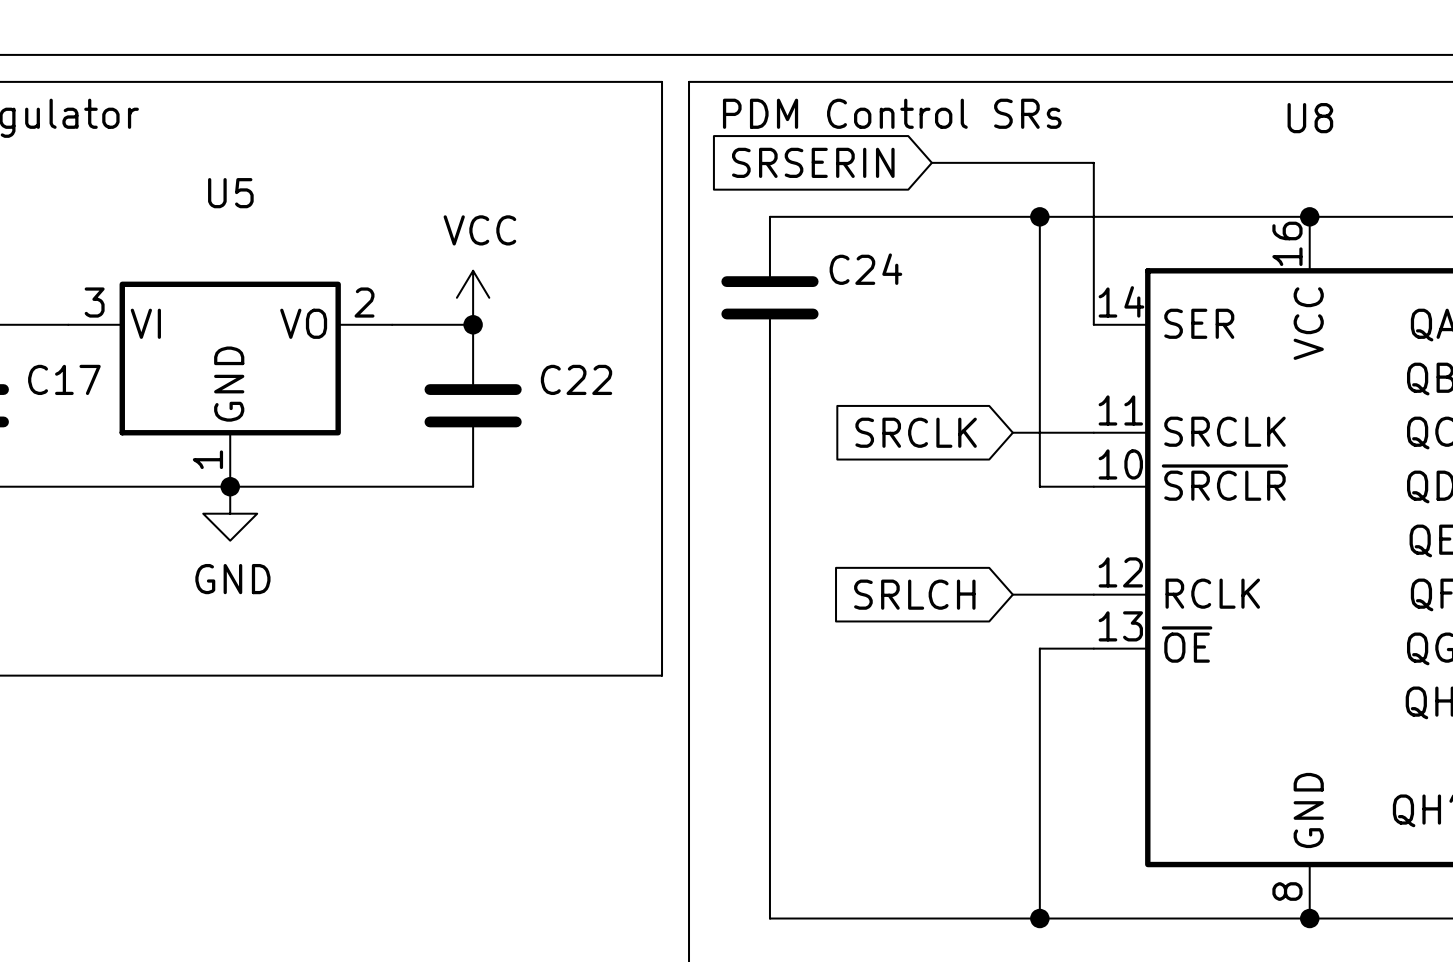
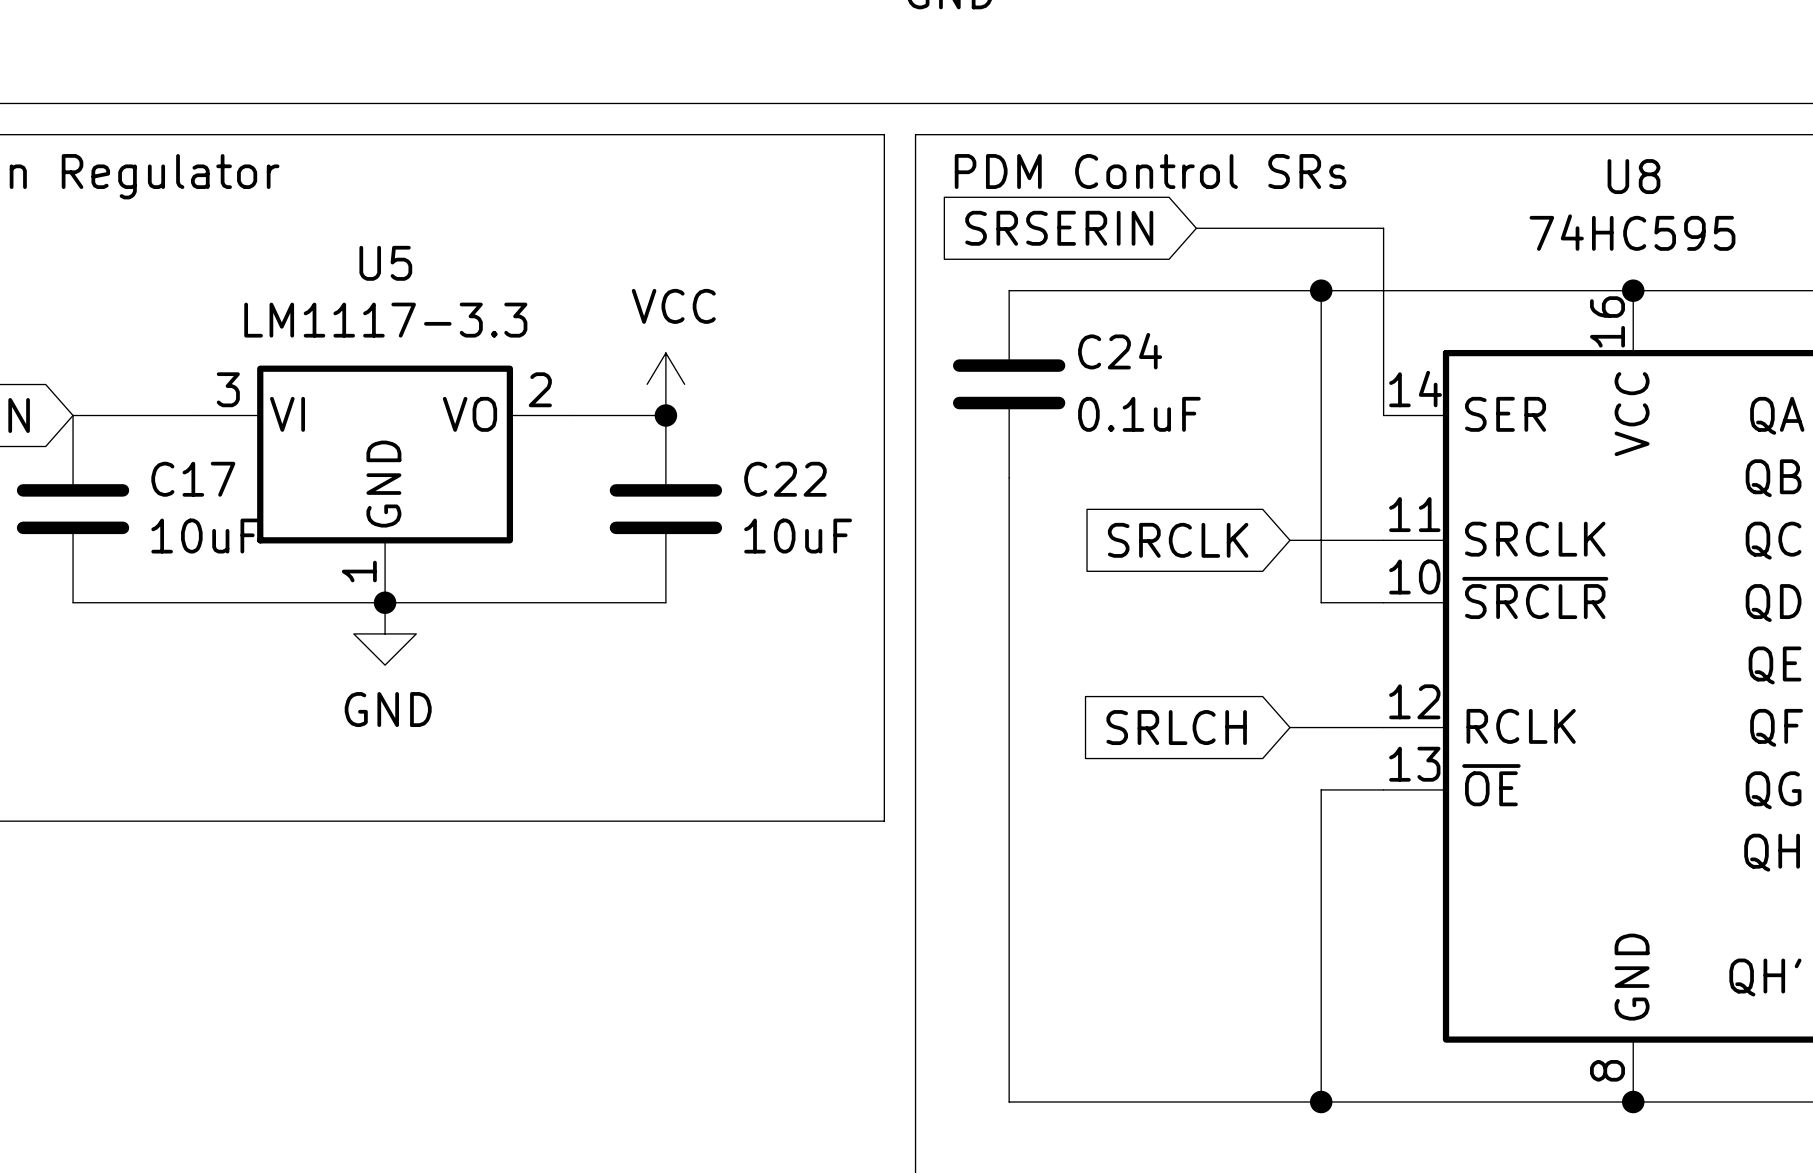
U8 value: none -> 74HC595 (1632, 232)
U5 value: none -> LM1117-3.3 (385, 320)
C24 value: none -> 0.1uF (1139, 414)
C17 value: none -> 10uF (205, 536)
C22 value: none -> 10uF (798, 536)

